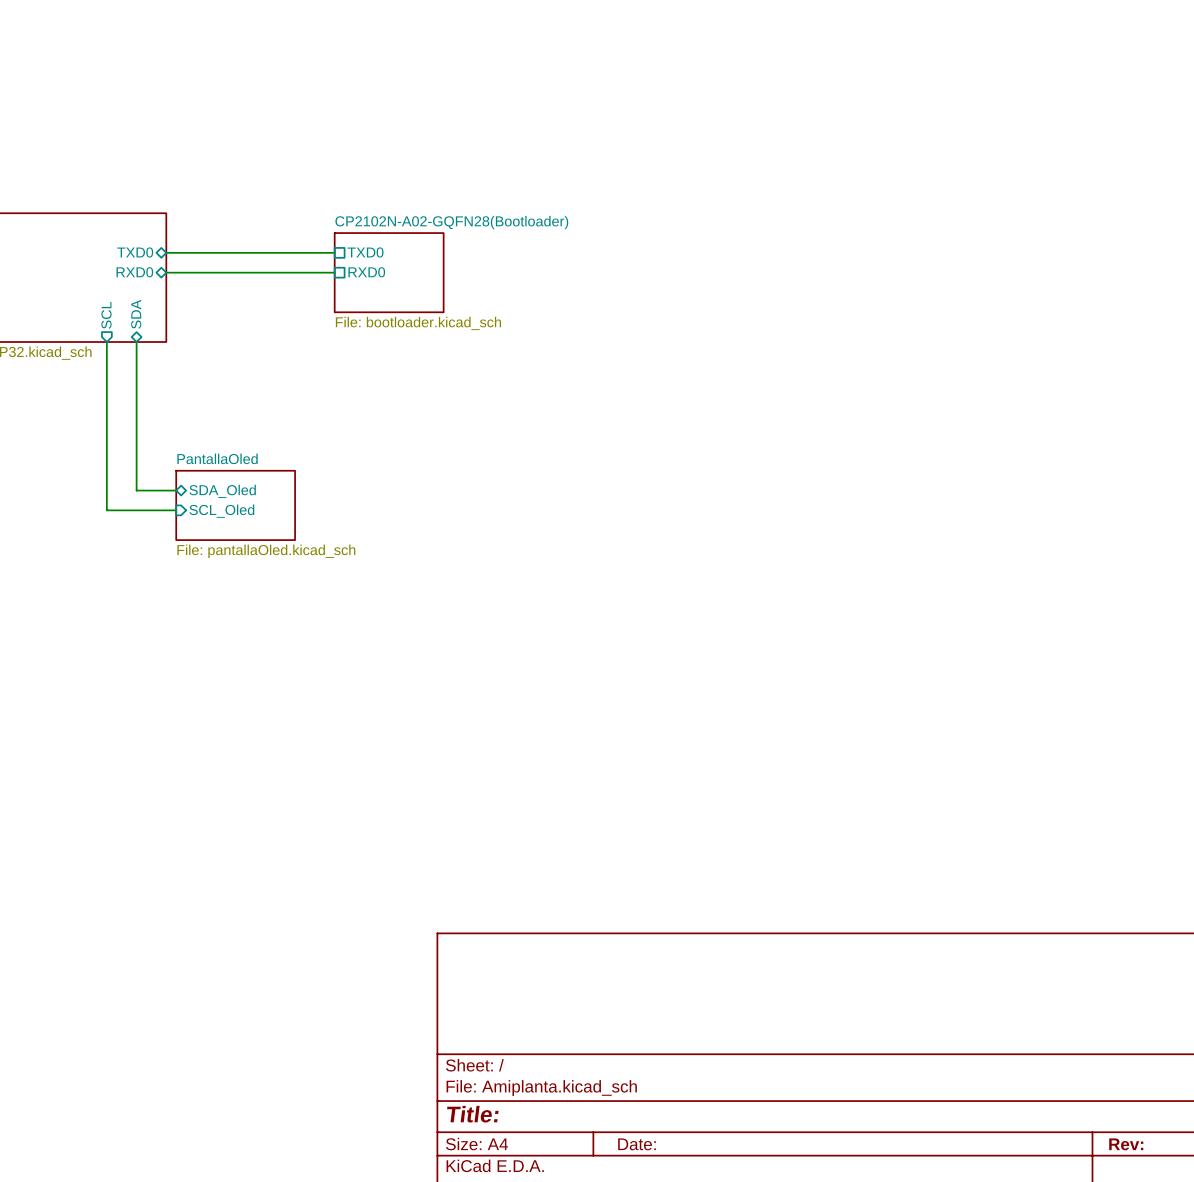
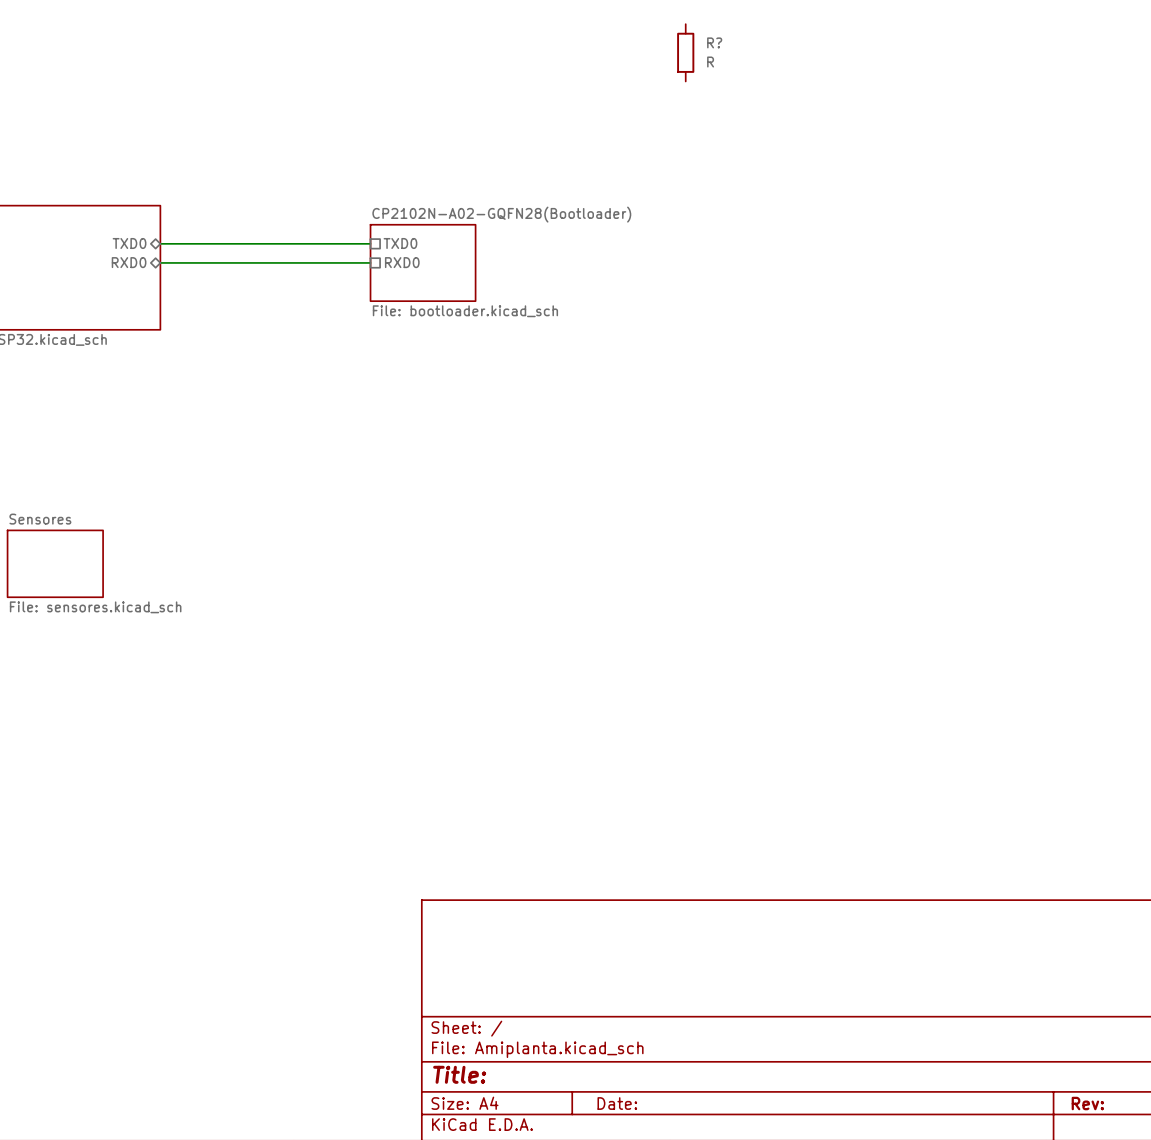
R?: none -> R (685, 52)
wire: none -> (322, 243) (370, 243)
sheet pin position: TXD0 (365, 252) -> TXD0 (400, 243)
wire: none -> (322, 262) (370, 262)
sheet pin position: RXD0 (366, 272) -> RXD0 (402, 262)
sheet CP2102N-A02-GQFN28(Bootloader) position: (389, 272) -> (423, 262)
sheet pin: SDA (136, 314) -> none
sheet pin: SCL (106, 315) -> none
wire: (106, 342) (106, 510) (176, 510) -> none
wire: (136, 342) (136, 490) (176, 490) -> none
sheet pin: SDA_Oled (222, 491) -> none
sheet PantallaOled: File: pantallaOled.kicad_sch (235, 505) -> none
sheet pin: SCL_Oled (221, 511) -> none
sheet Sensores: none -> File: sensores.kicad_sch (55, 563)

